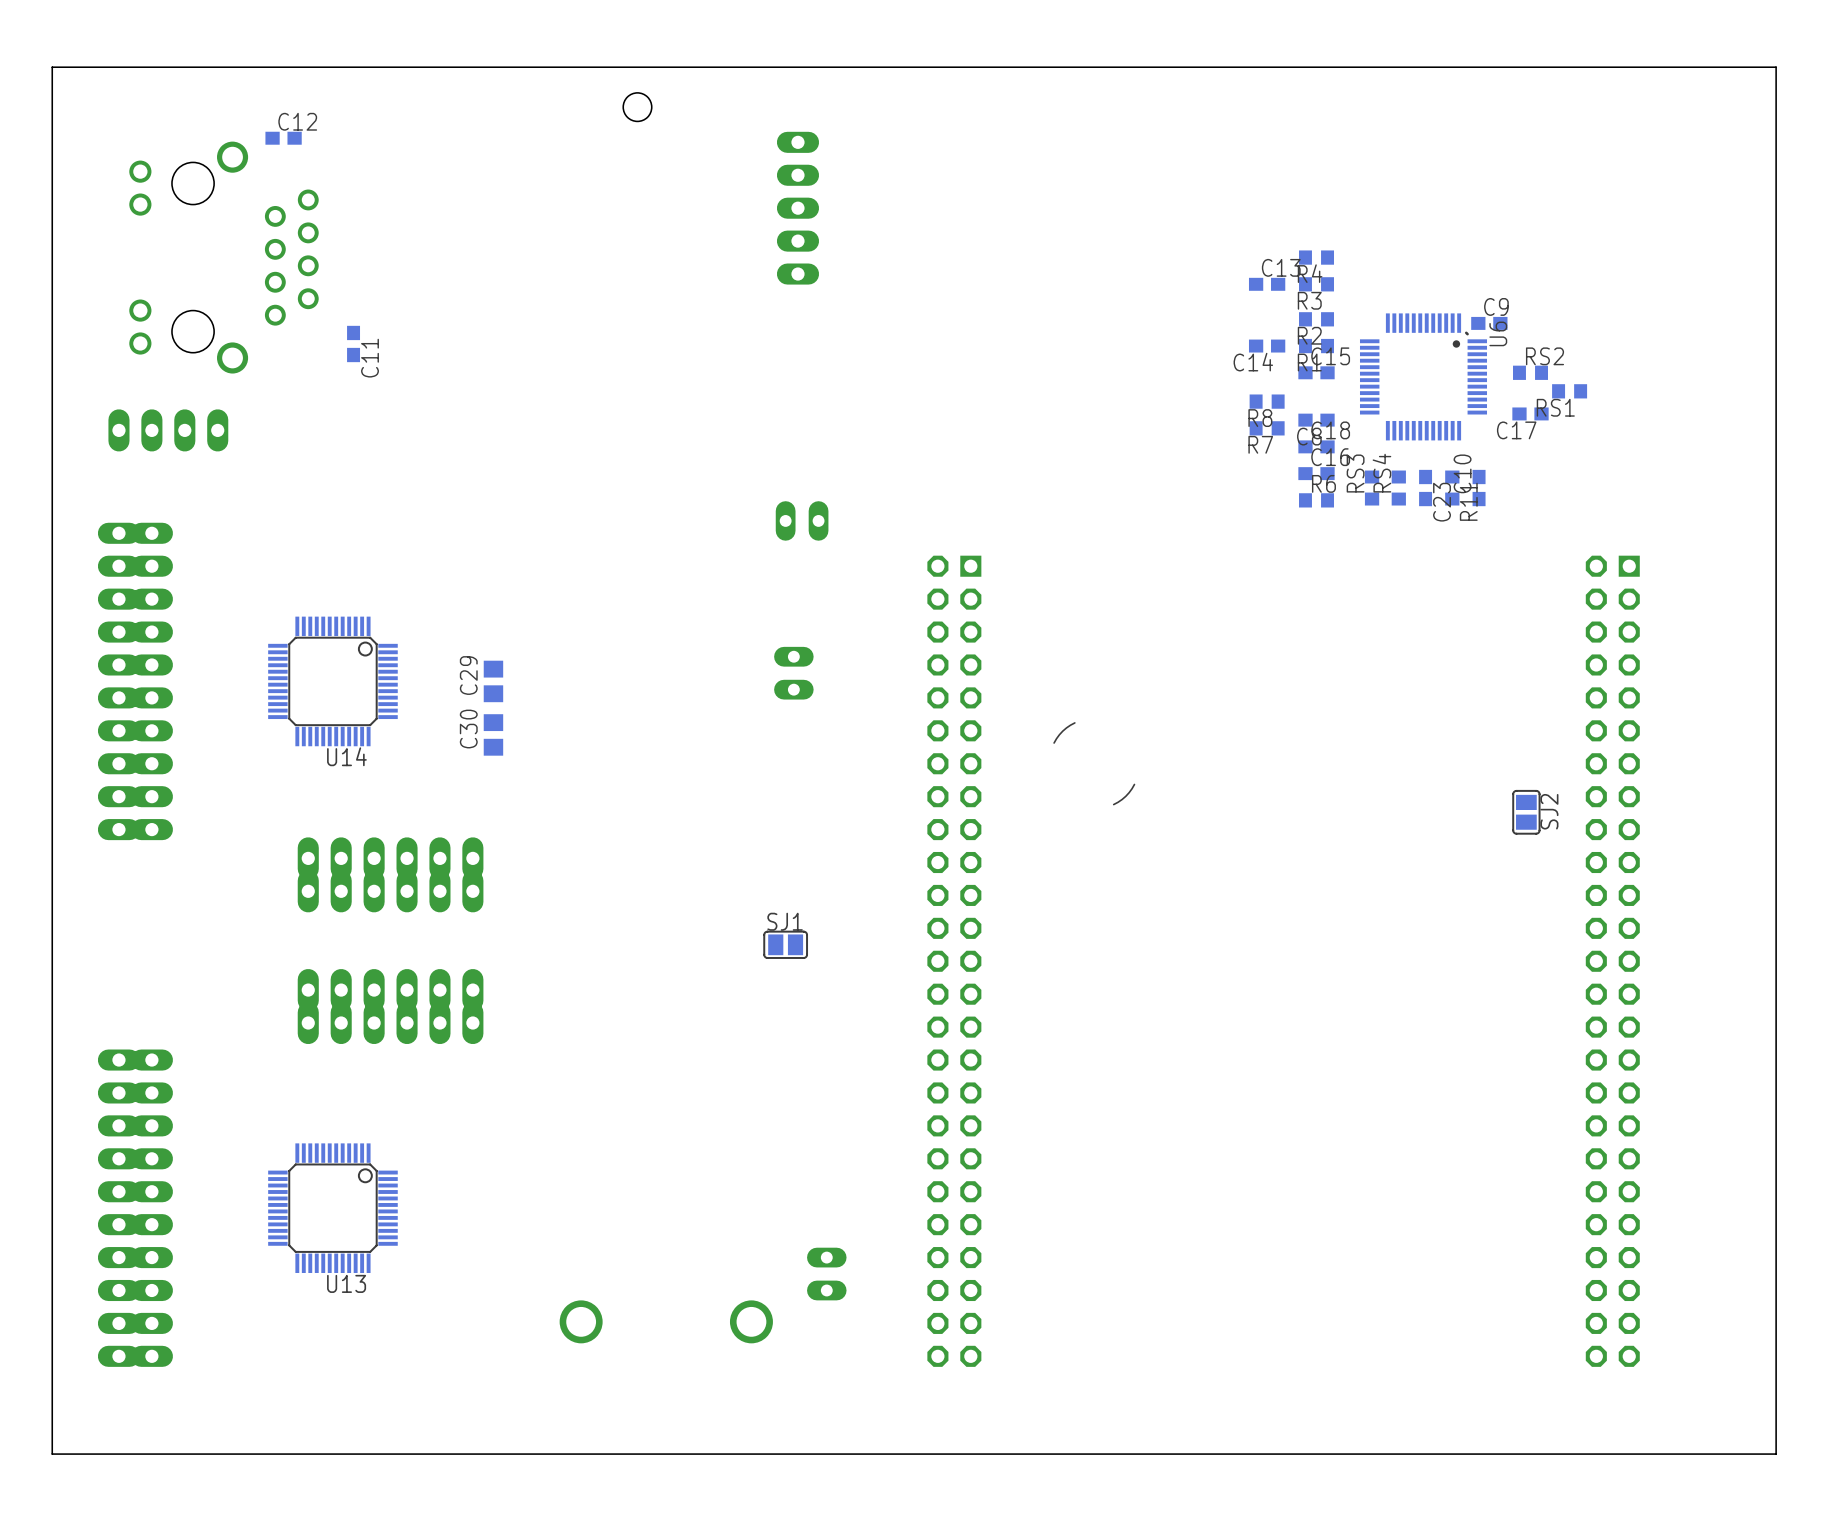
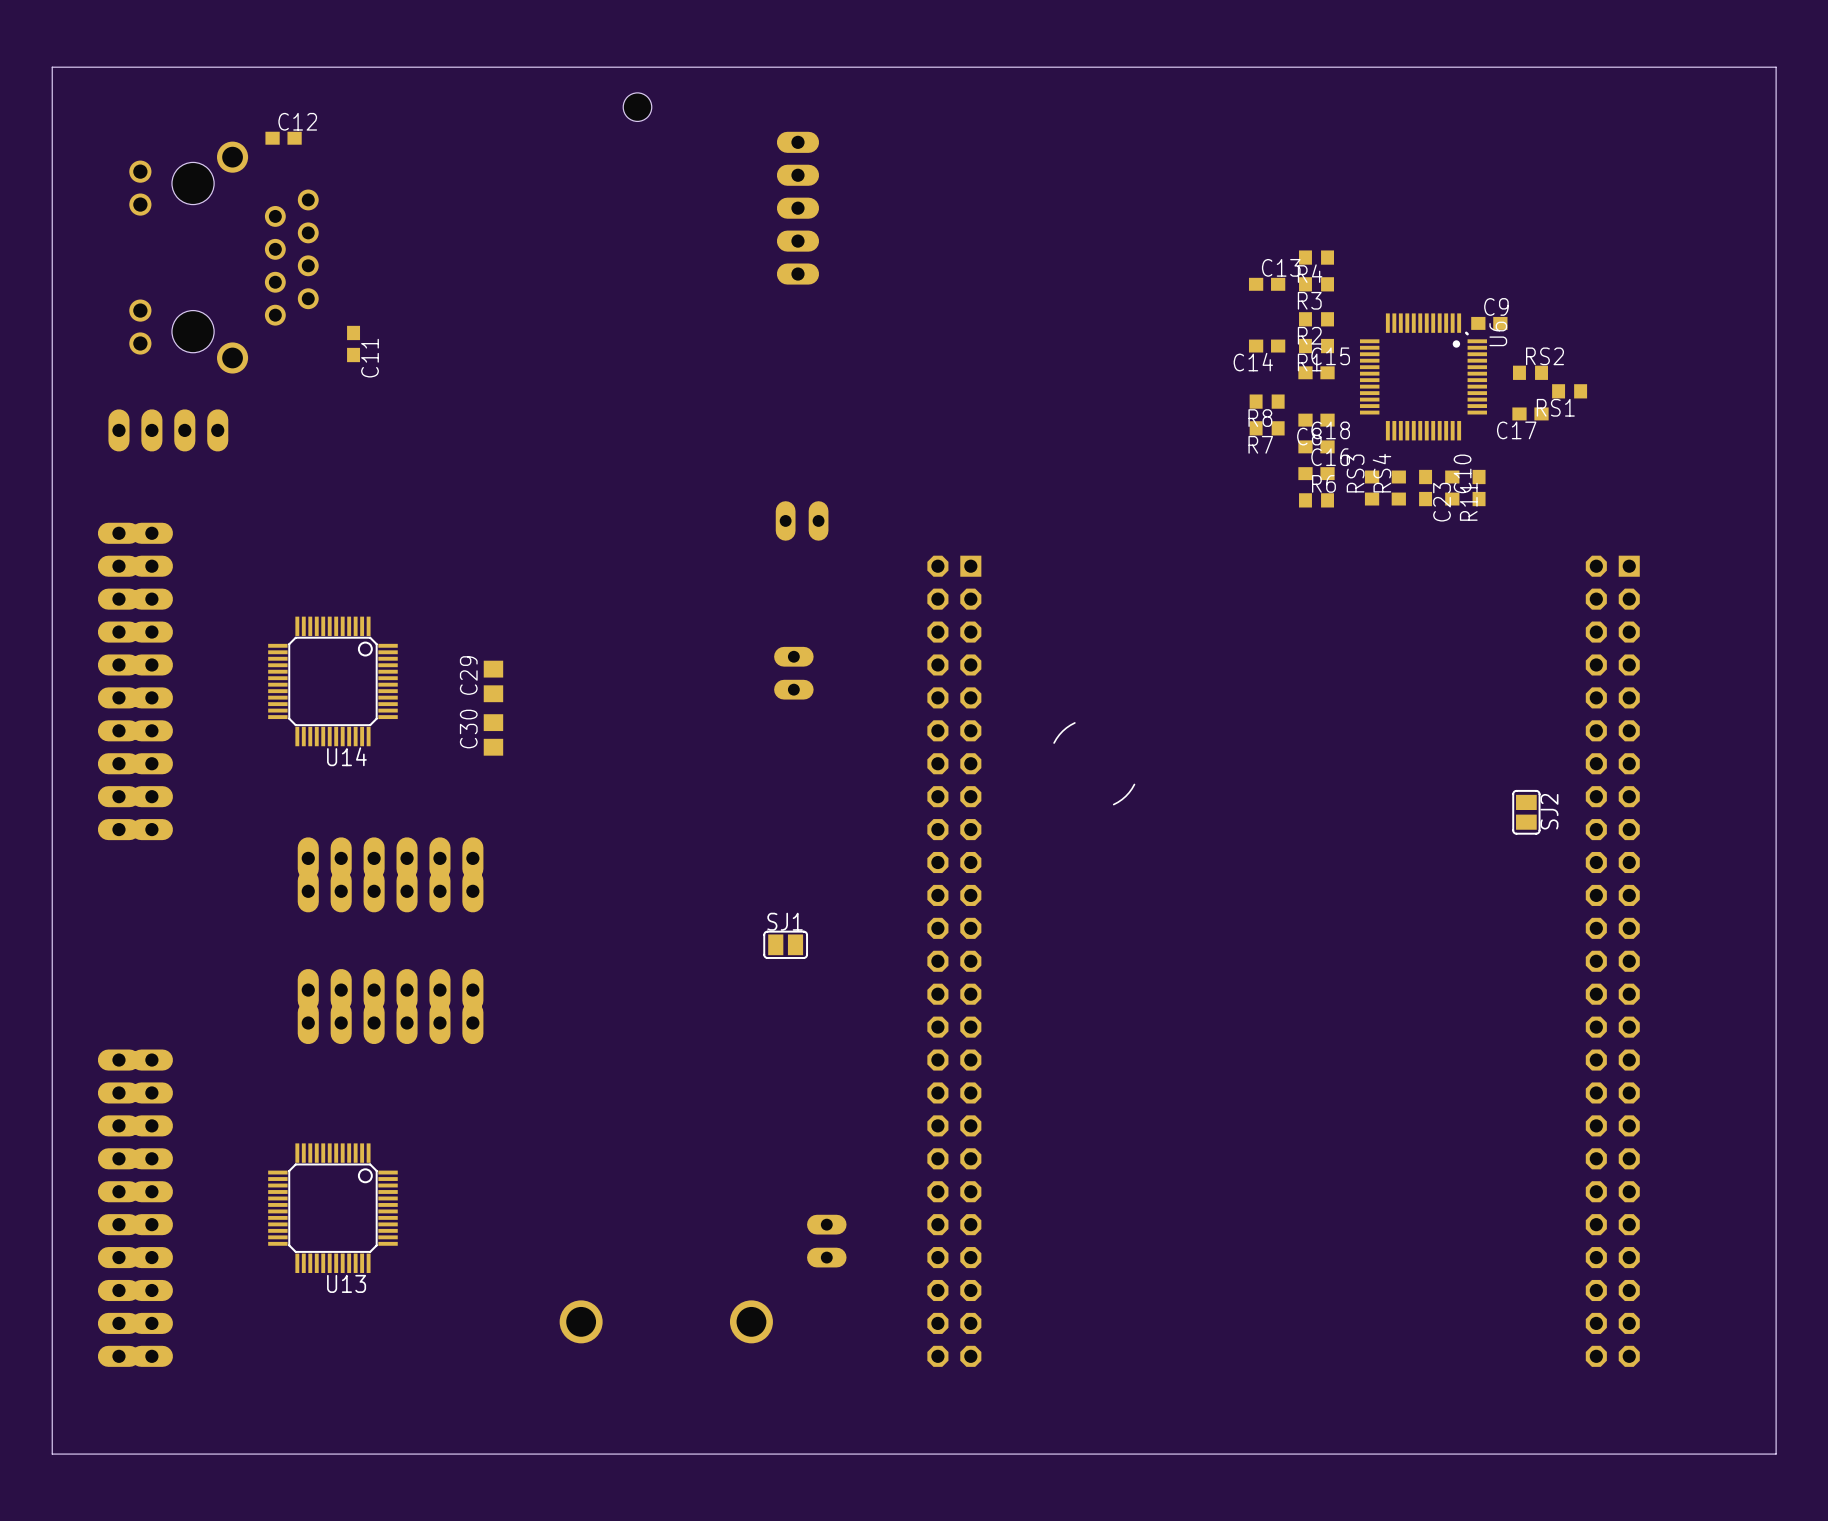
part position: (826, 1274) -> (826, 1241)

